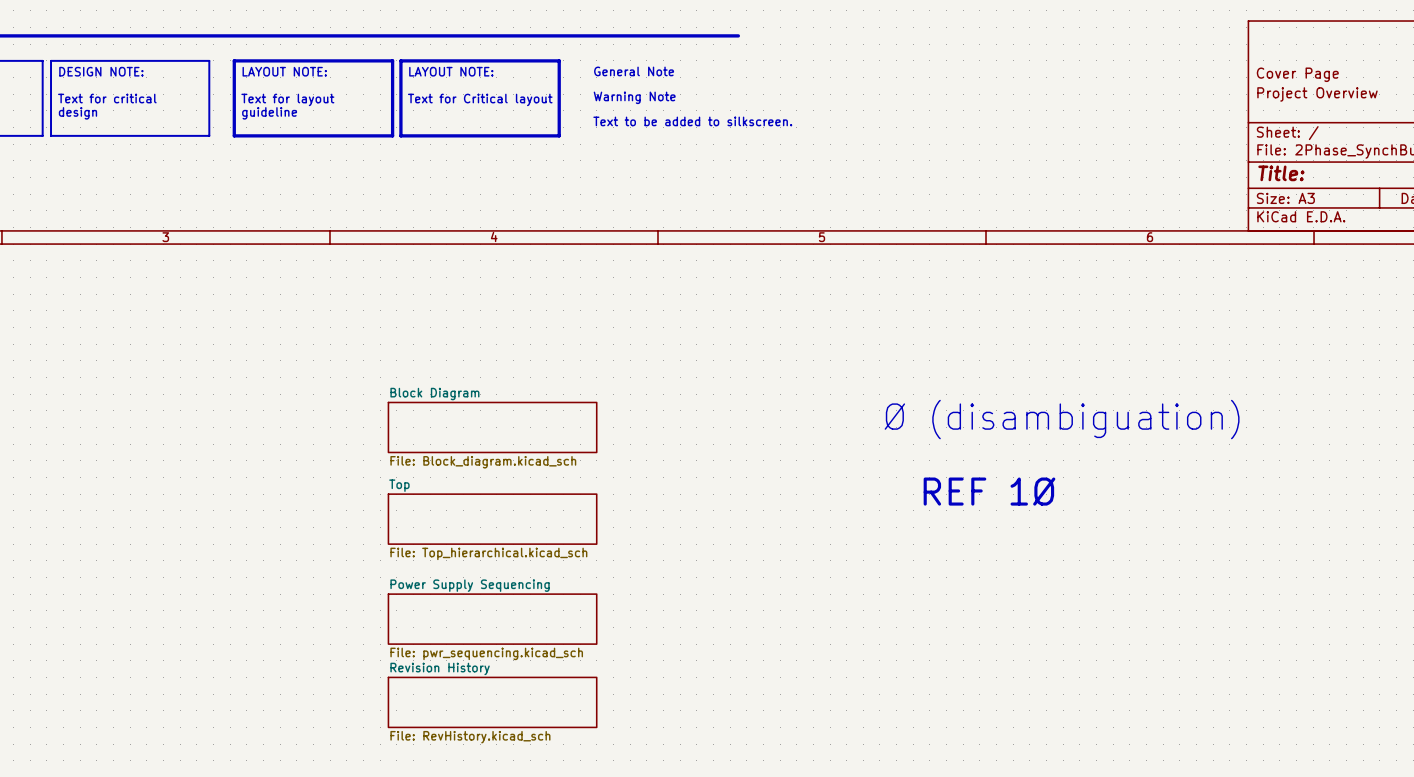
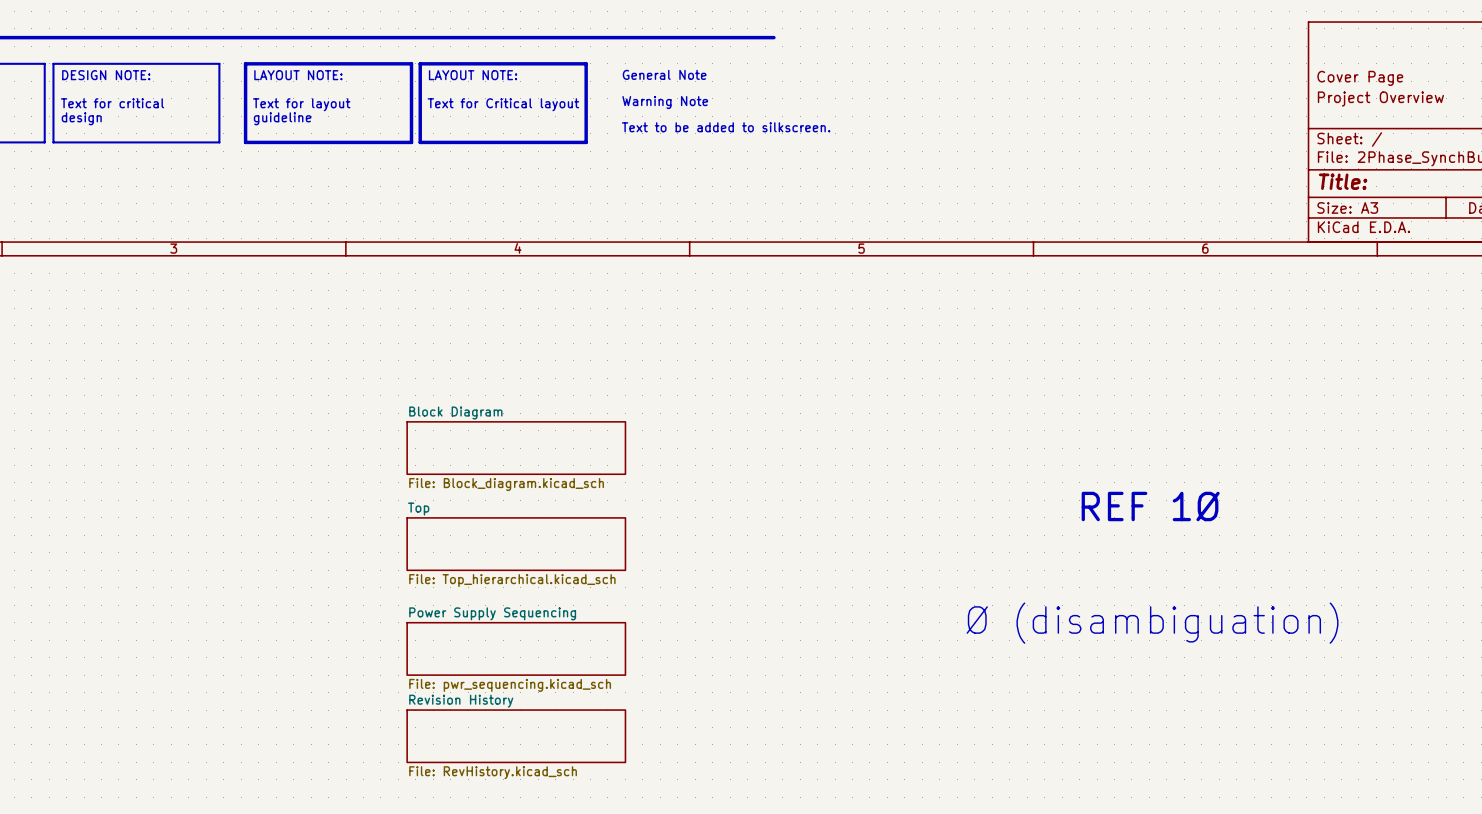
text: Ø (disambiguation) (1062, 419) -> none
text position: REF 1Ø (989, 491) -> REF 1Ø (1150, 506)
text: none -> Ø (disambiguation) (1152, 623)

